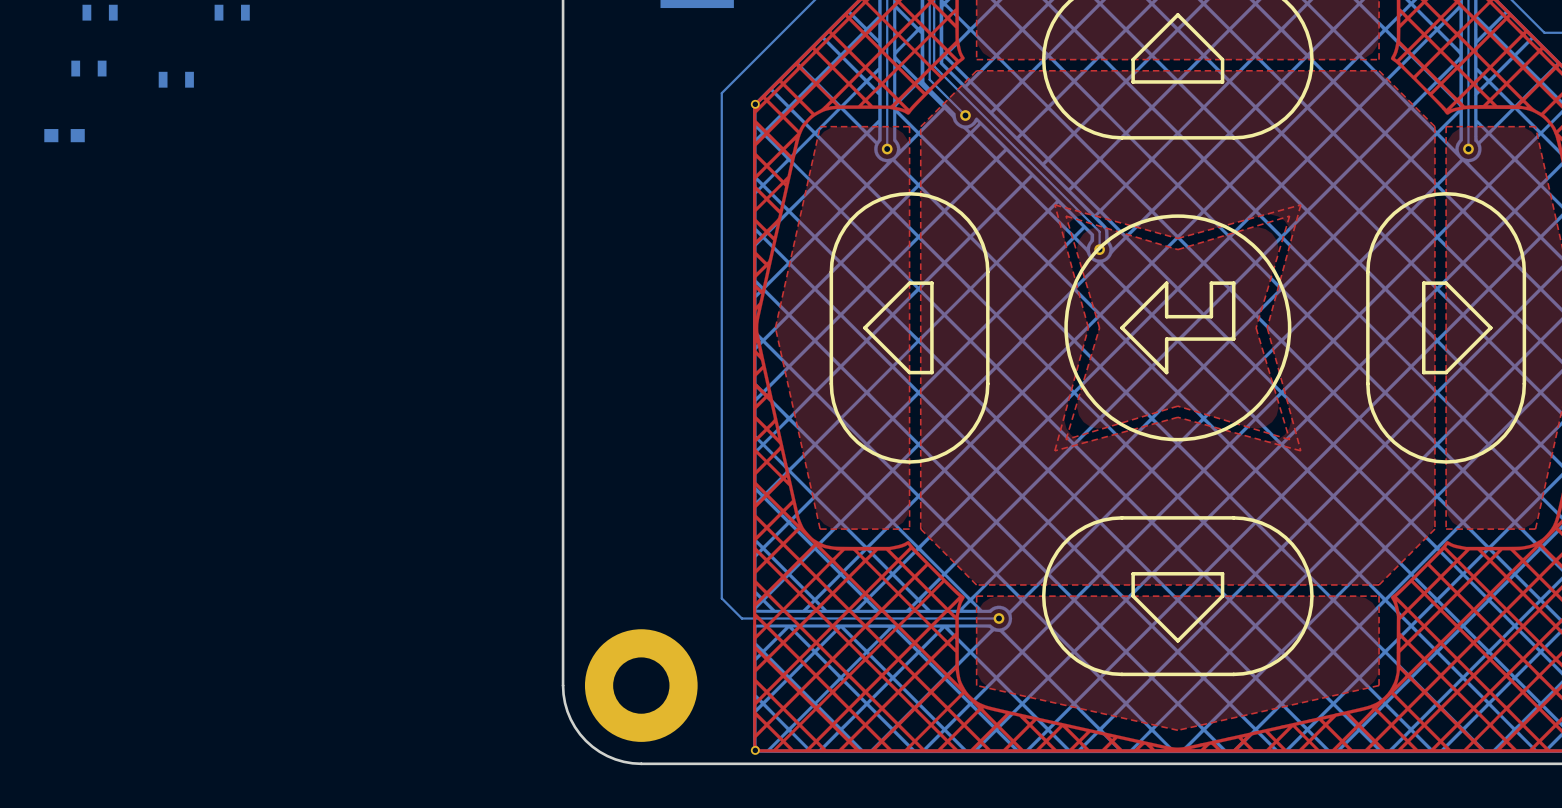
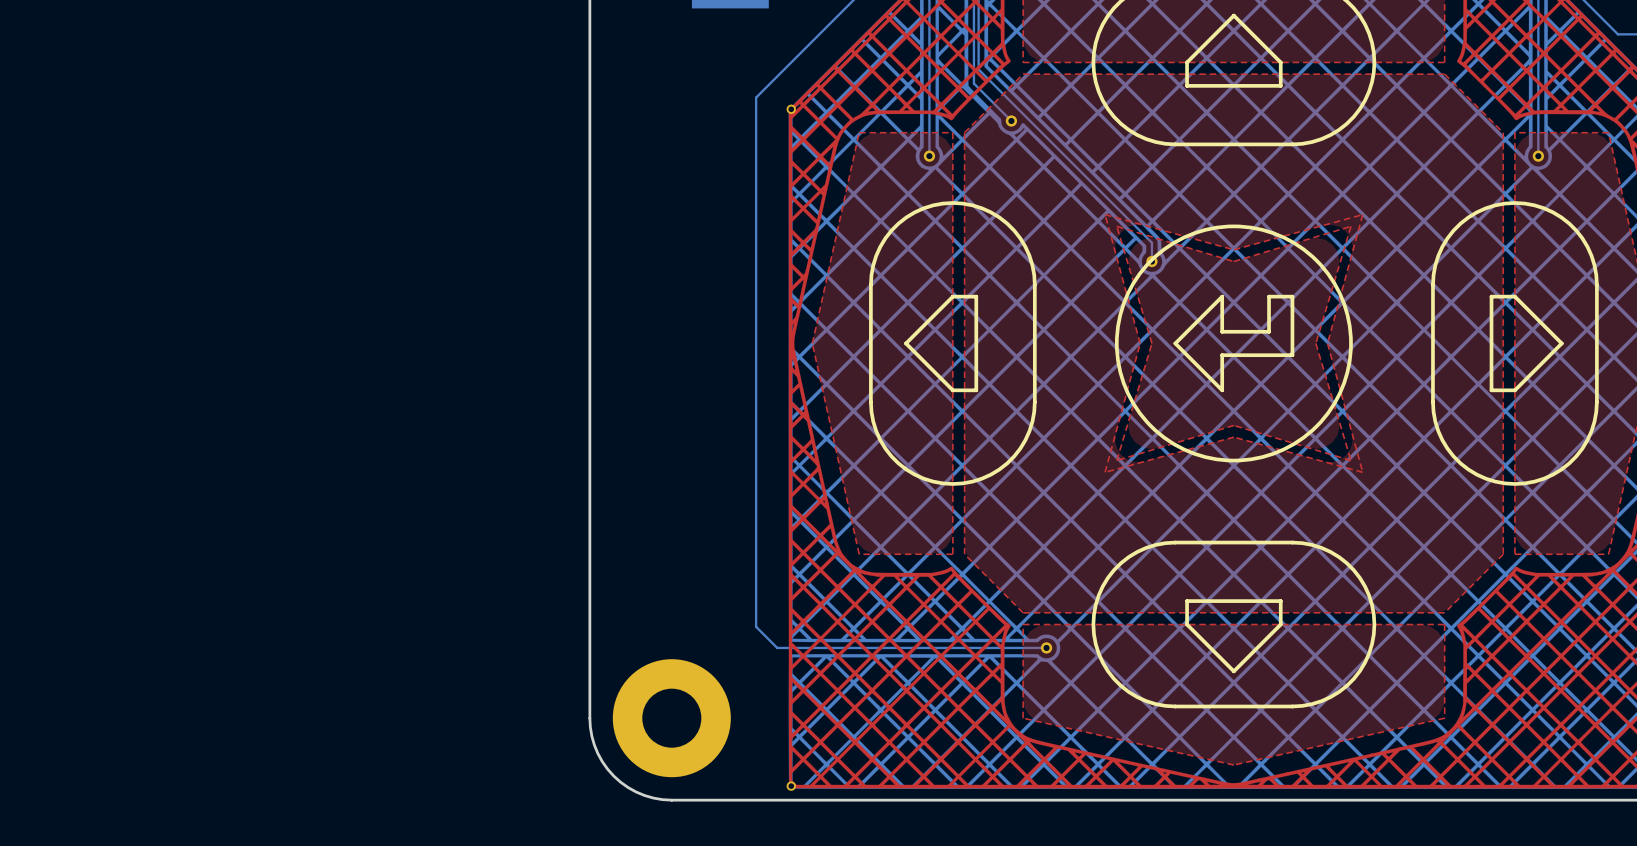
part: (100, 12) -> none
part: (232, 12) -> none
part: (88, 68) -> none
part: (176, 79) -> none
part: (64, 135) -> none

